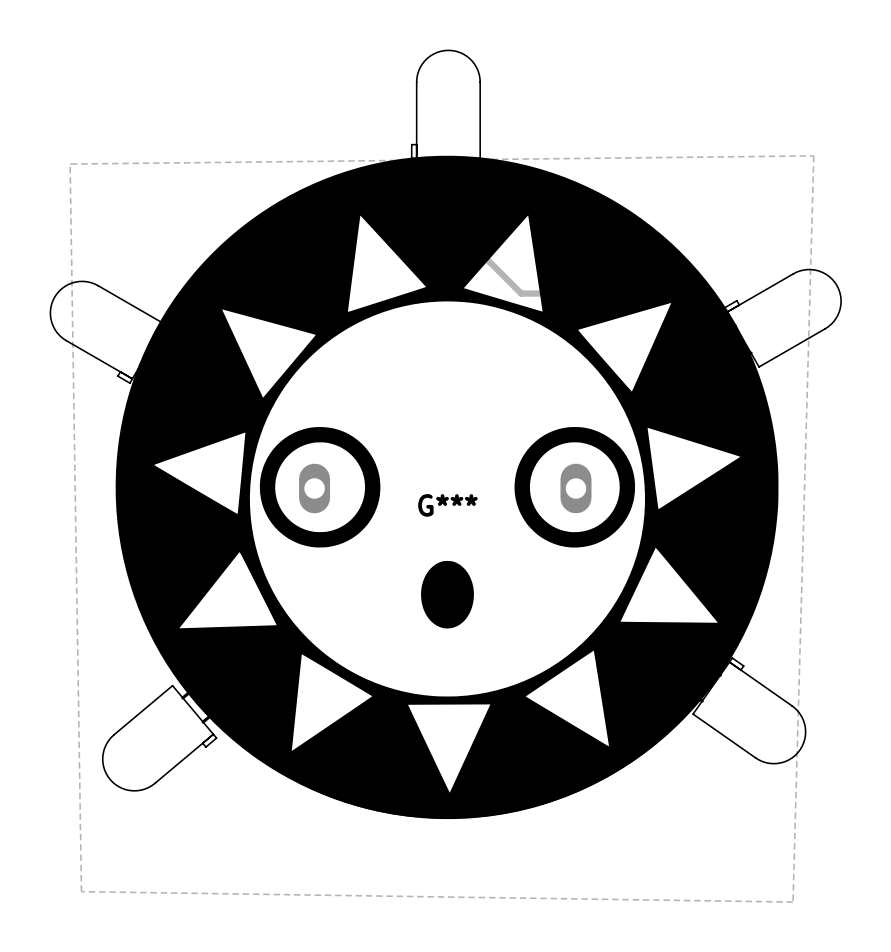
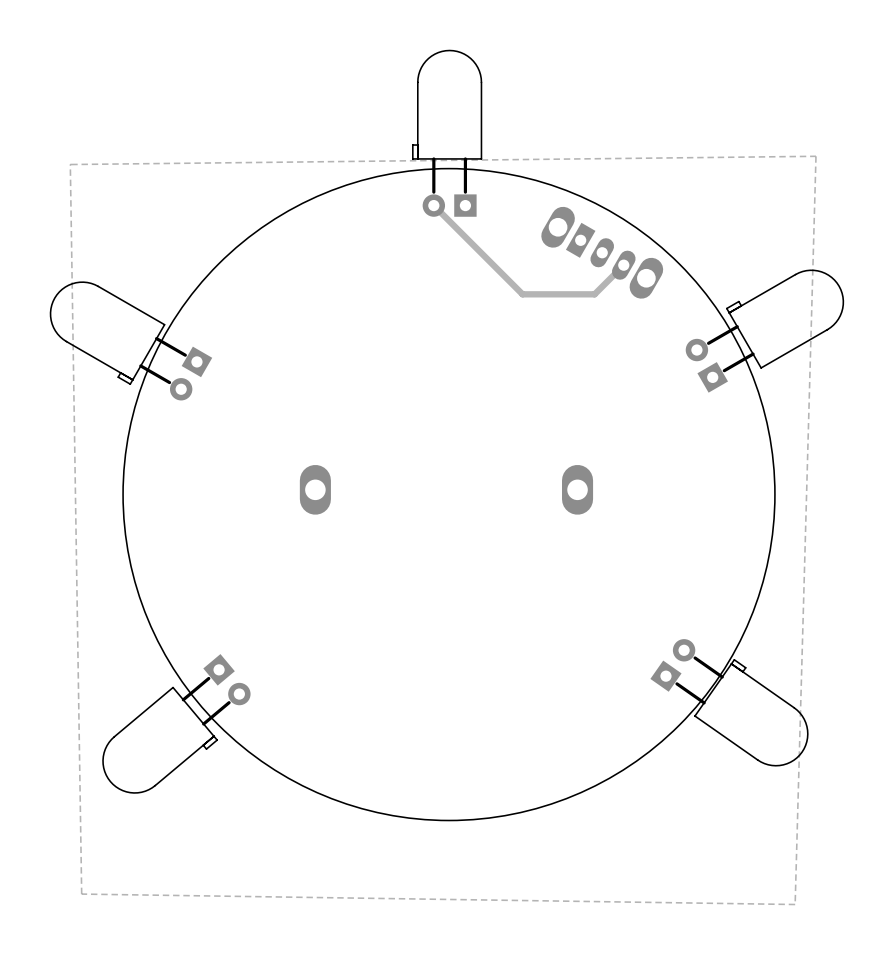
G***: (447, 487) -> none

